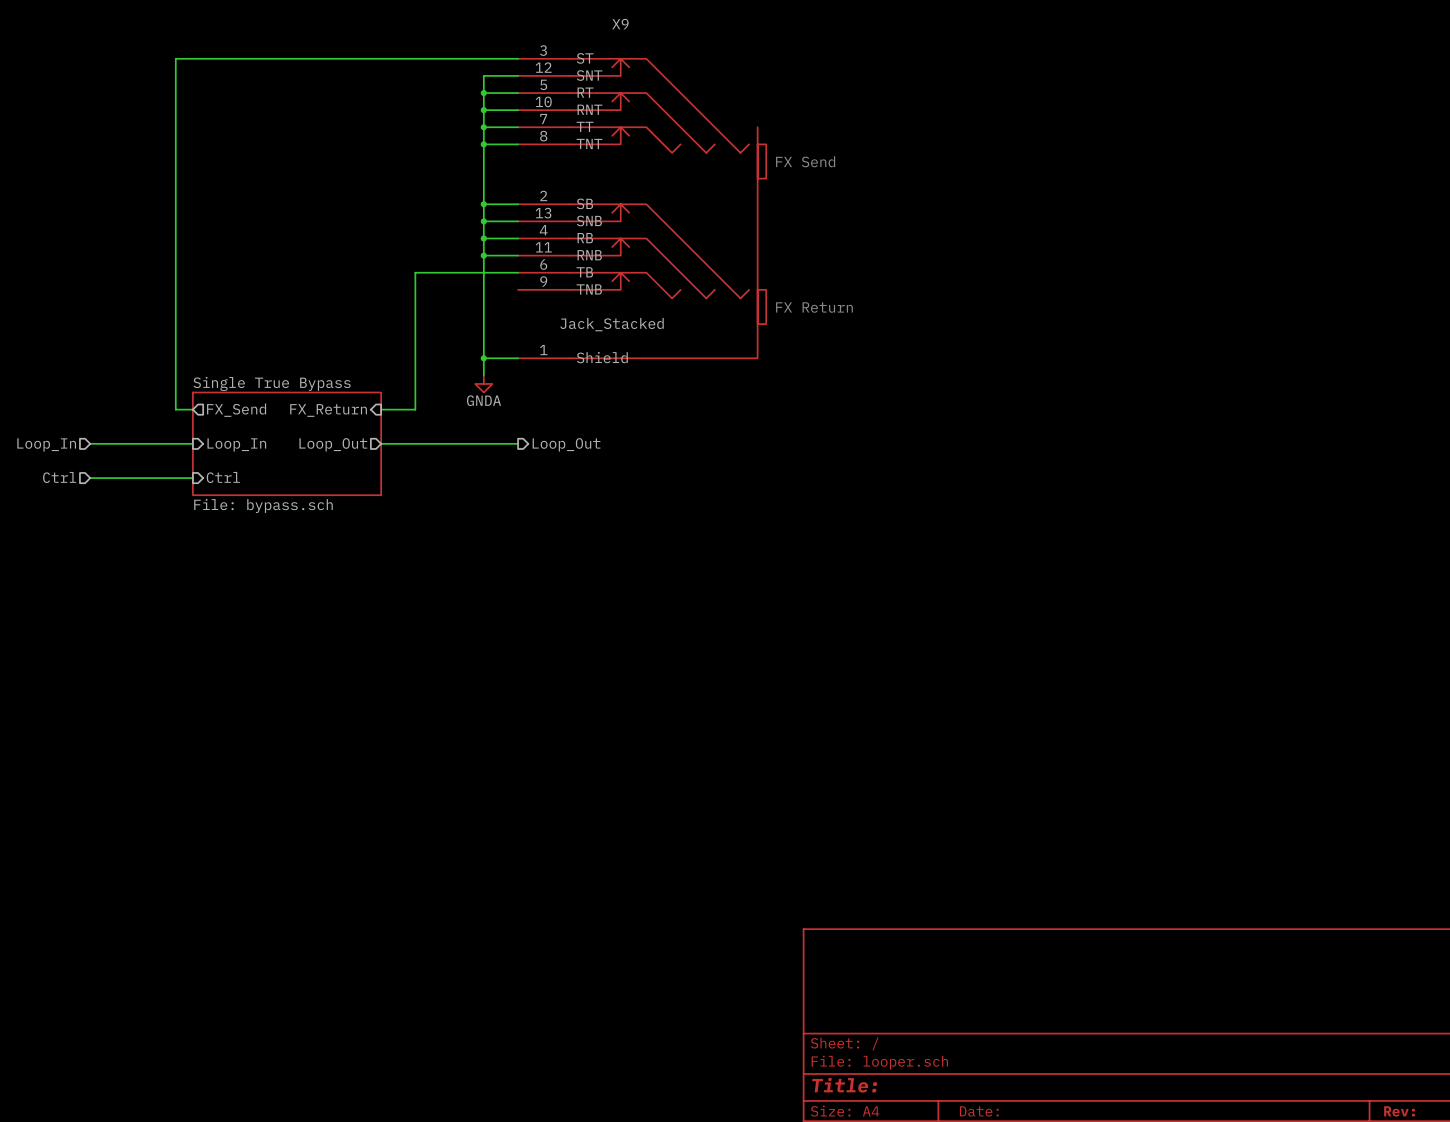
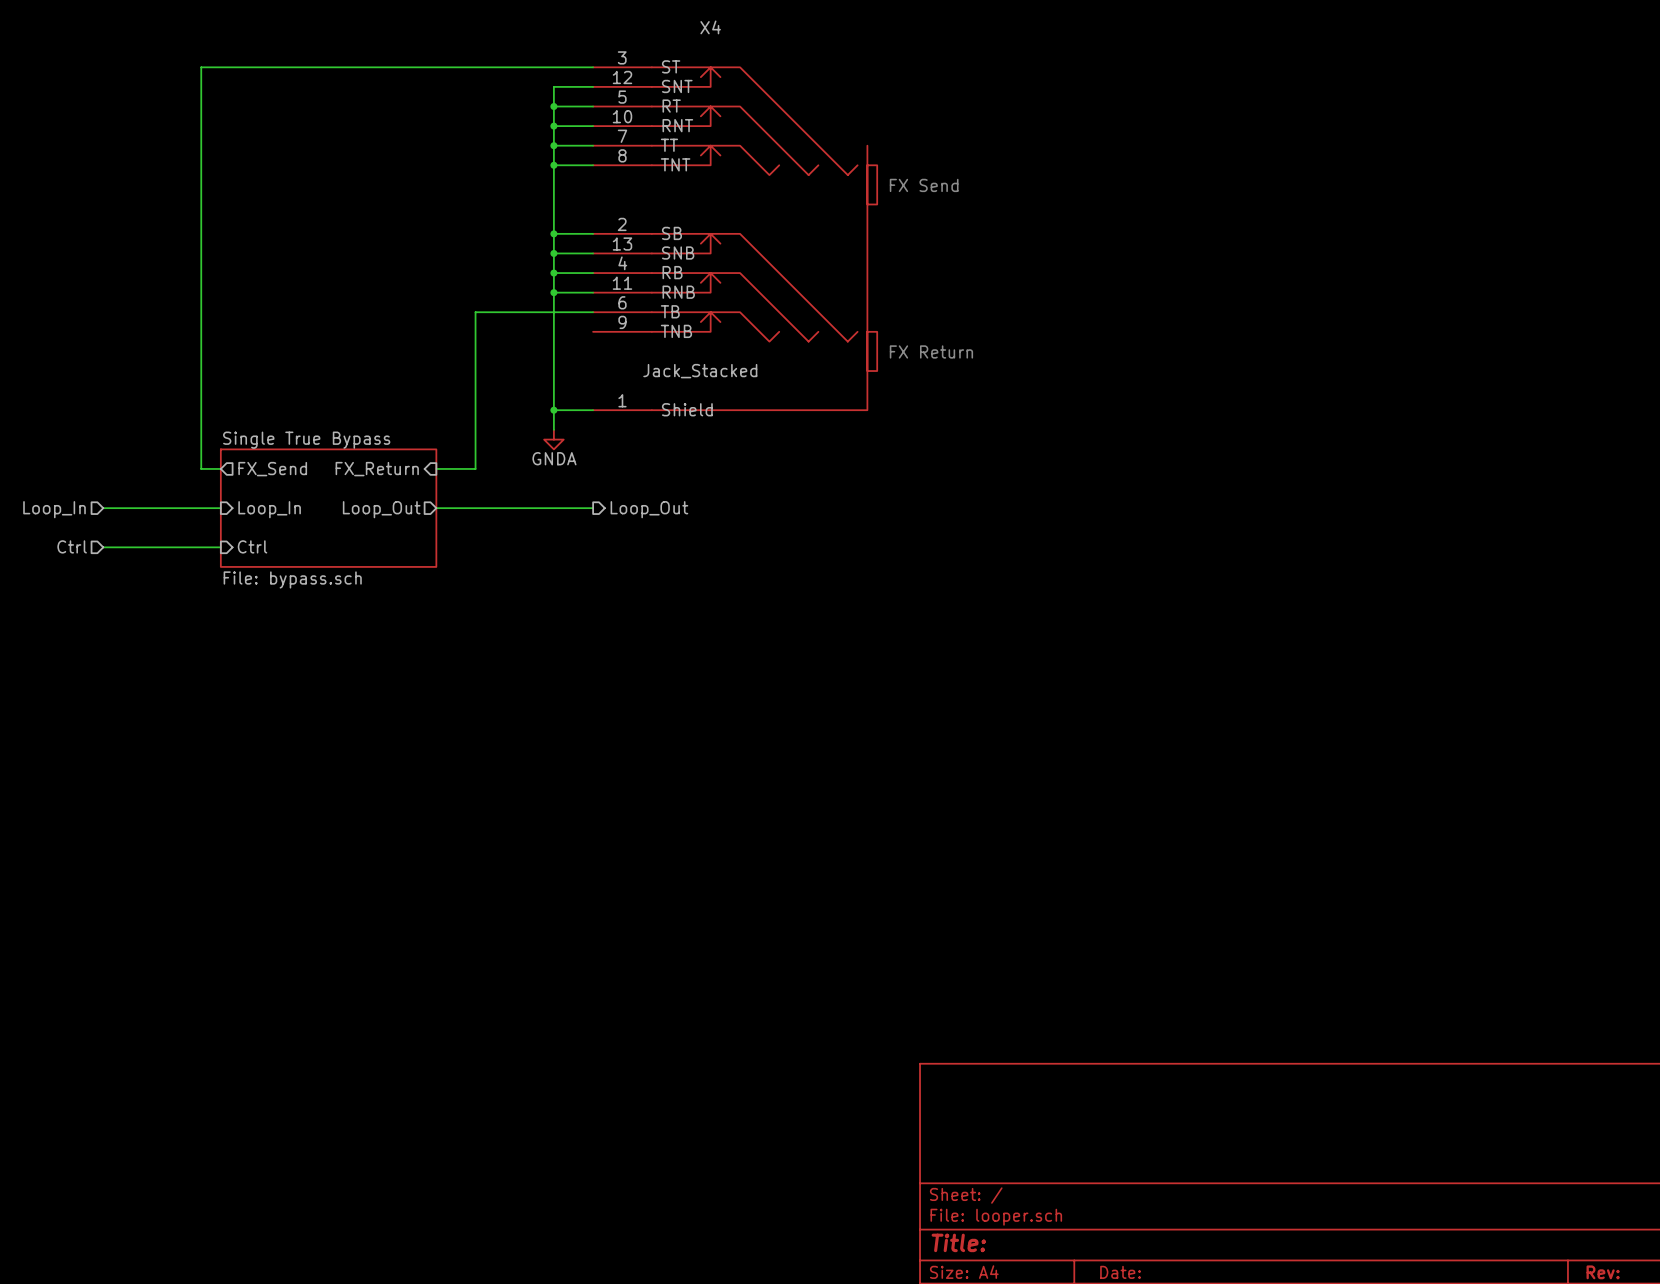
X9 name: X9 (620, 24) -> X4 (710, 27)

